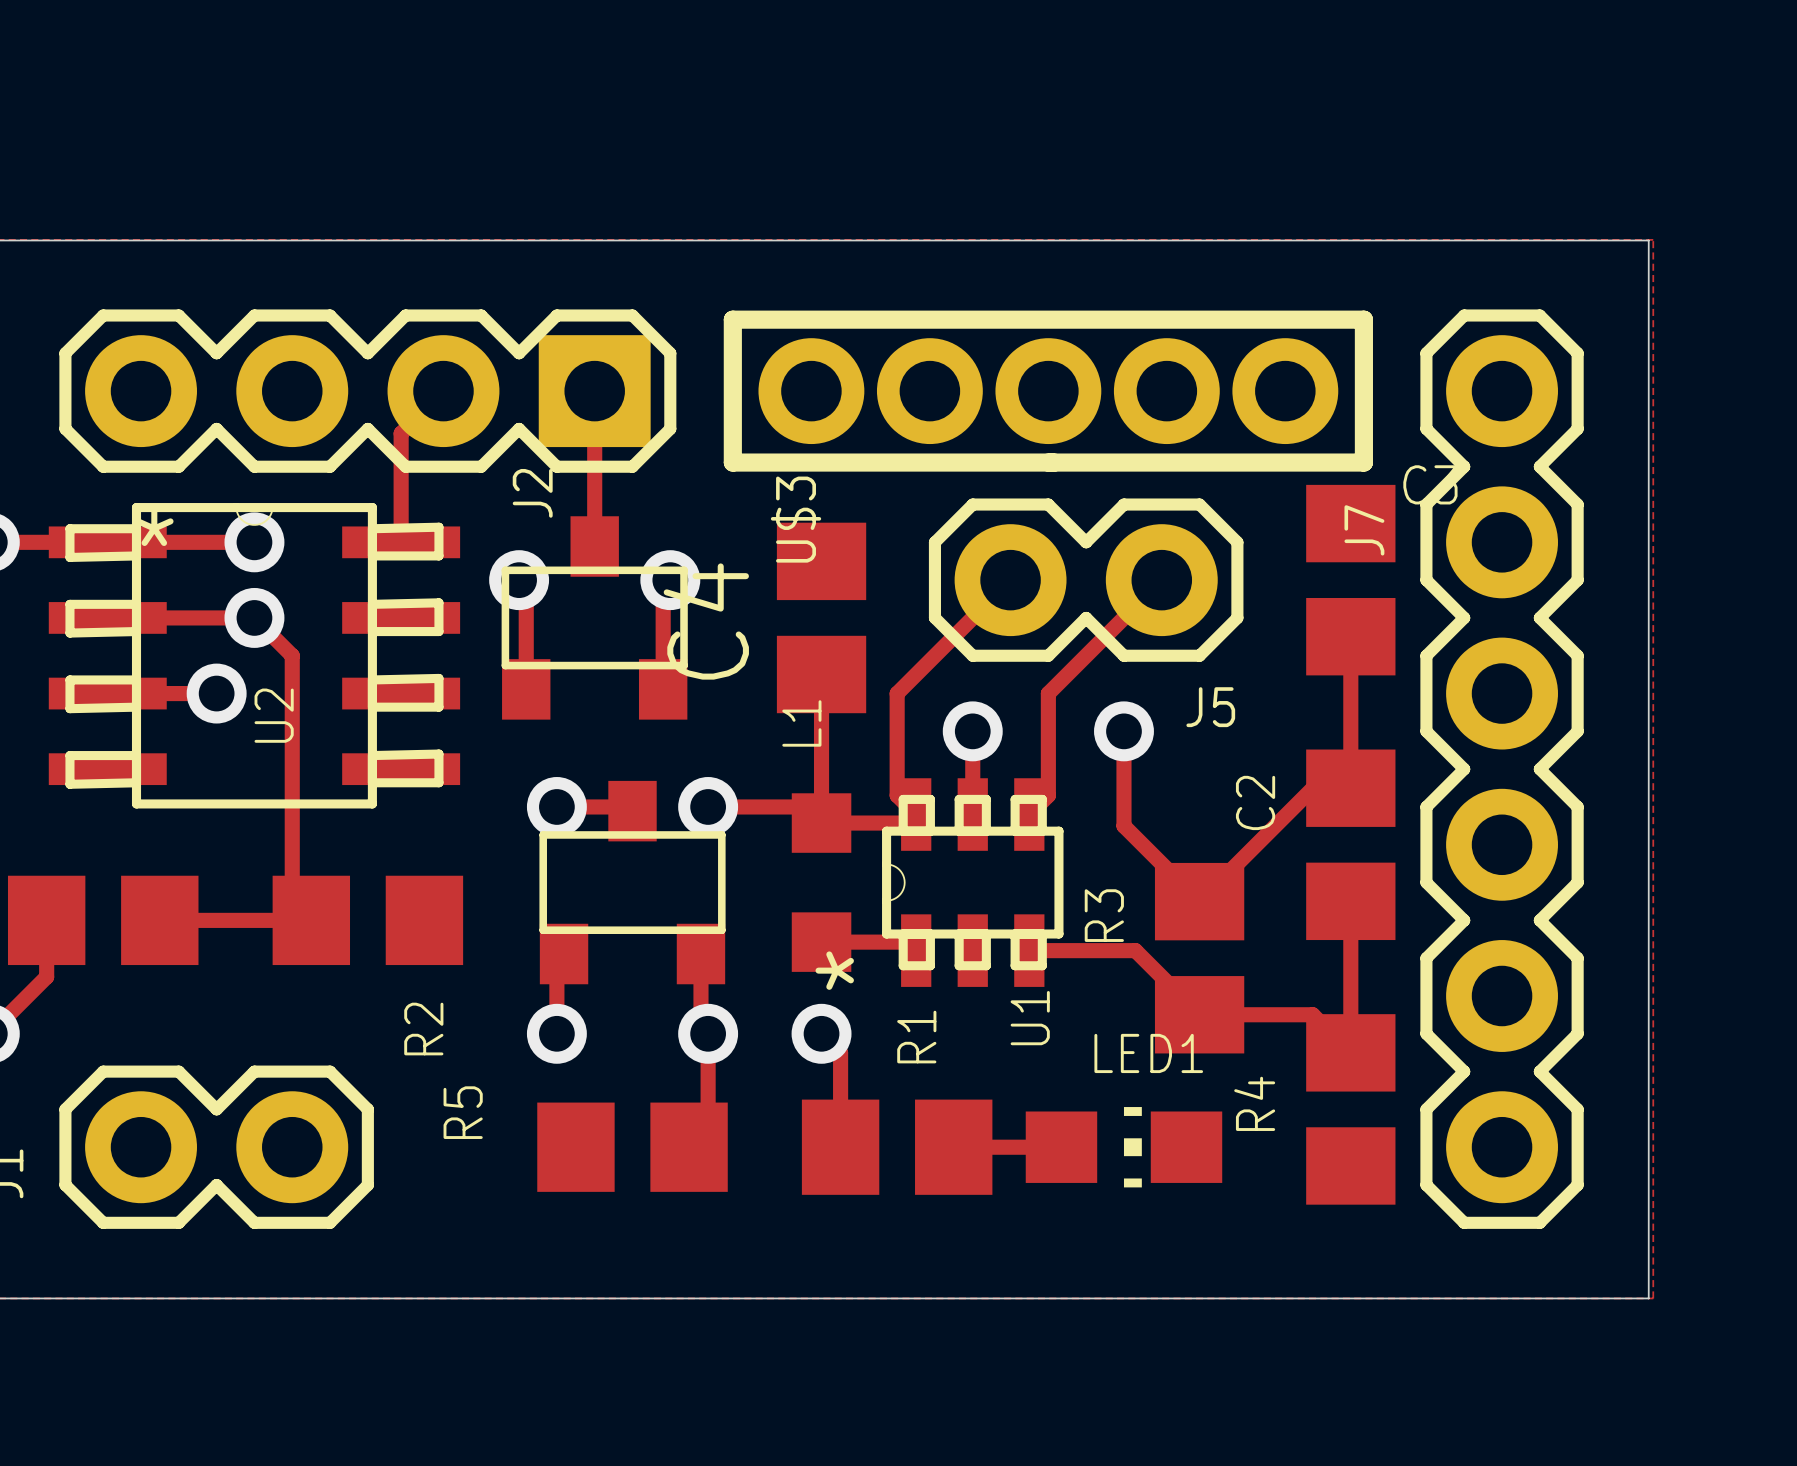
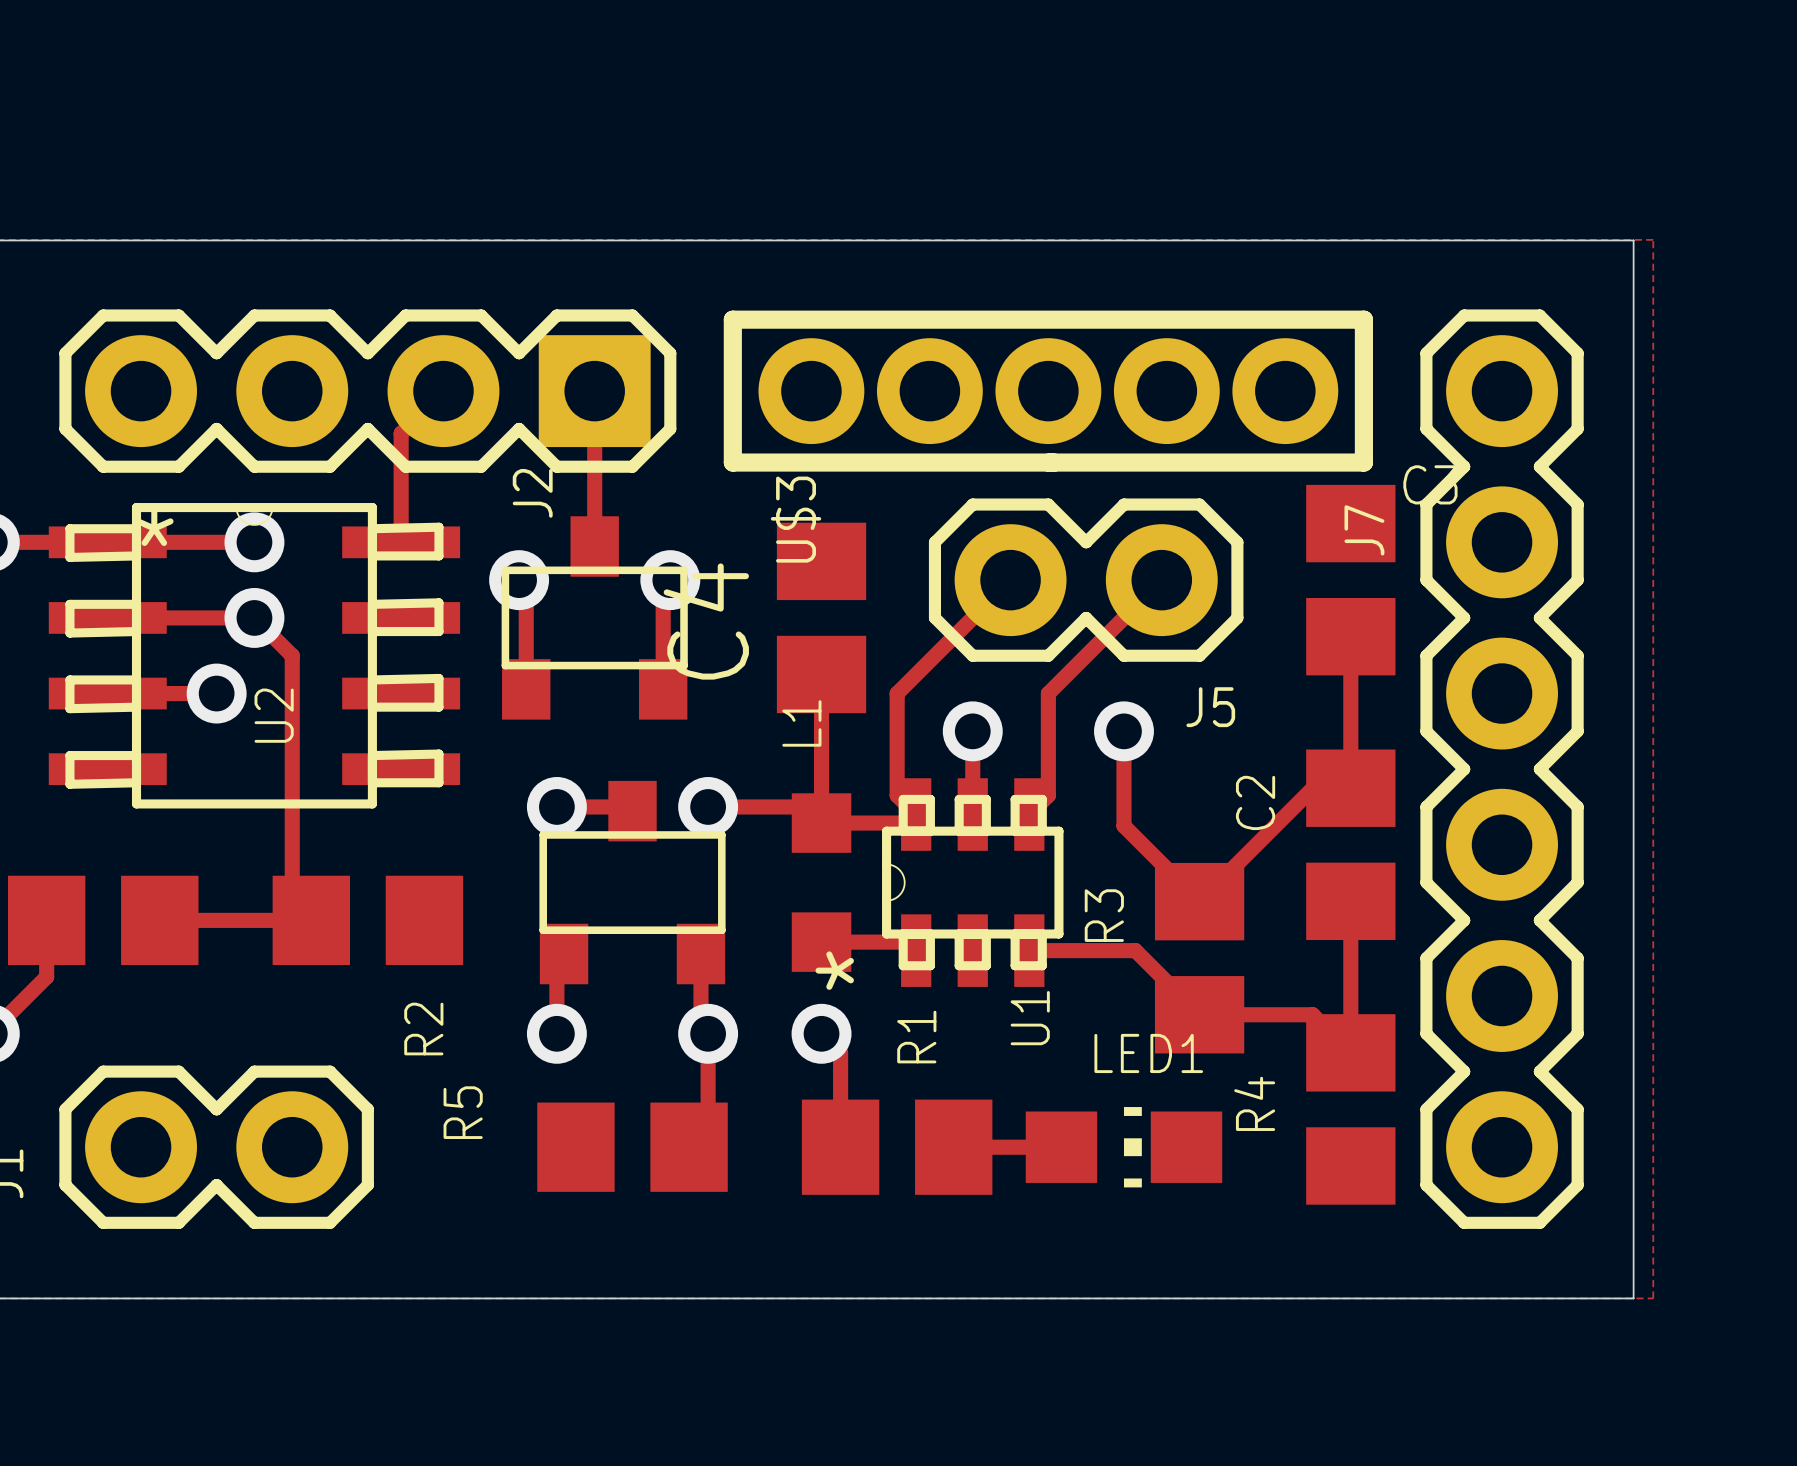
board edge: (1633, 240) (1648, 240) (1648, 1298) (1633, 1298) -> (1633, 240) (1633, 1298)

